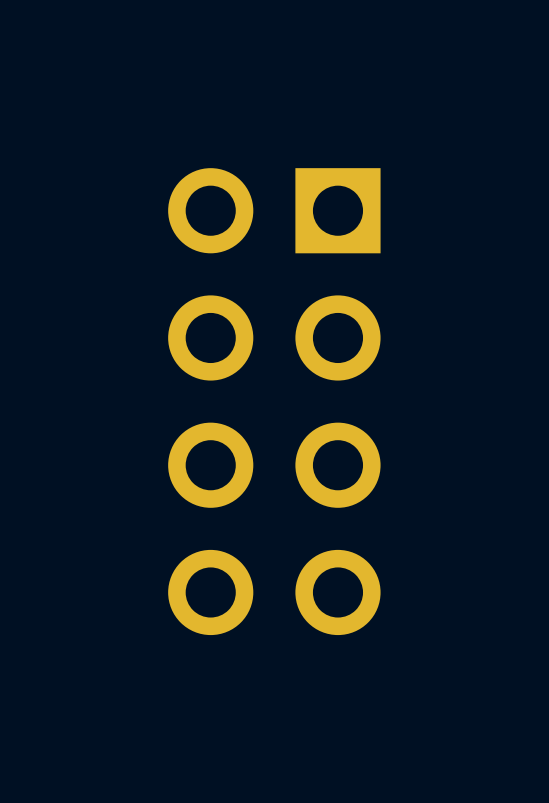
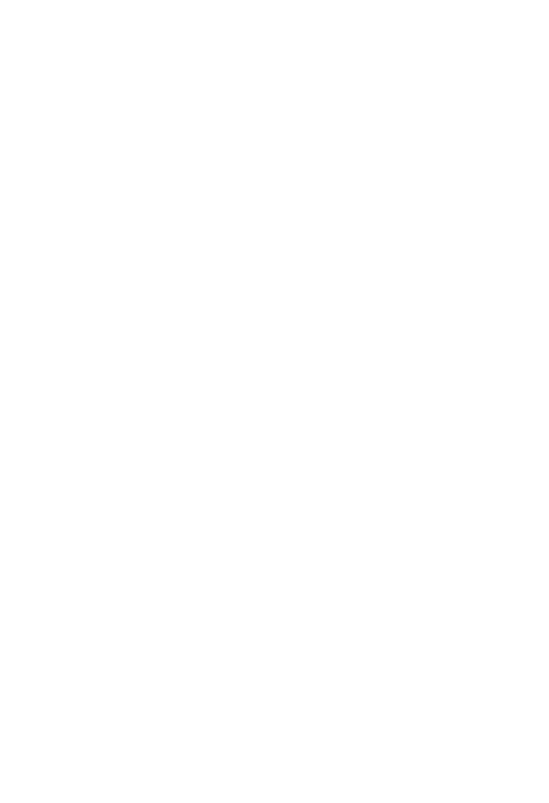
part: (274, 401) -> none

